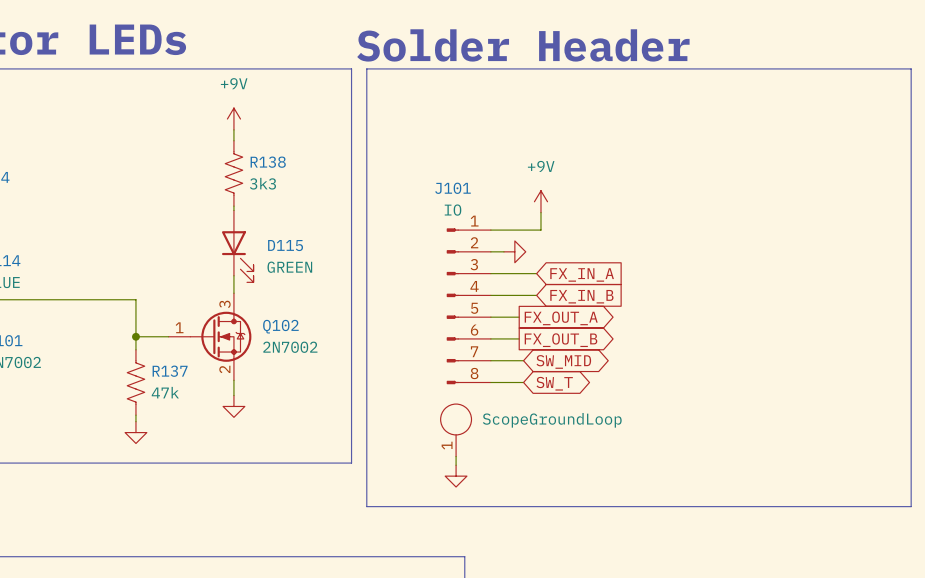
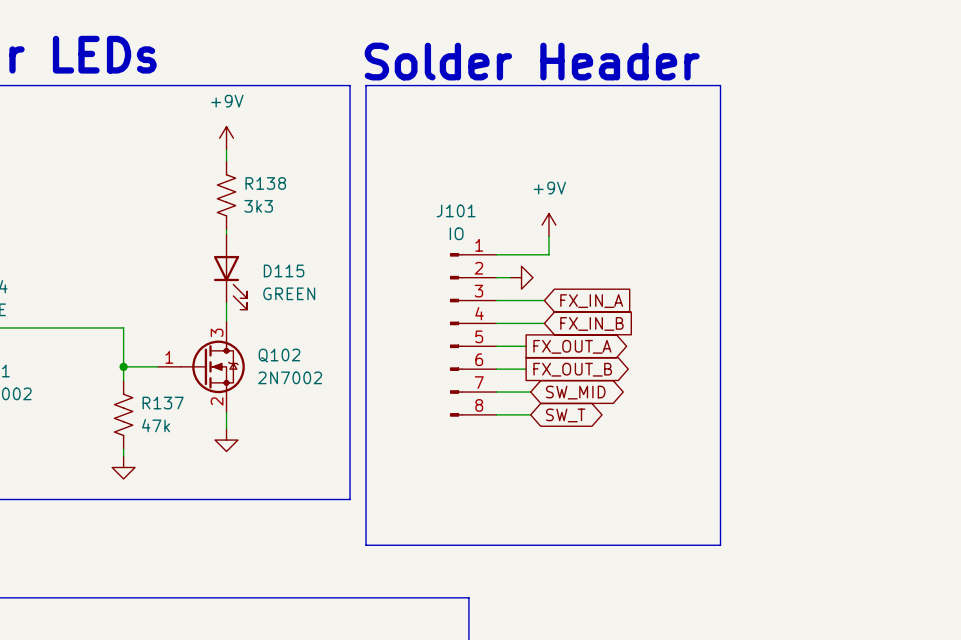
line: (704, 68) (911, 68) (911, 506) (704, 506) -> (720, 85) (720, 545)
part: ScopeGroundLoop (456, 430) -> none
wire: (456, 456) (456, 465) -> none
power symbol: (456, 476) -> none

